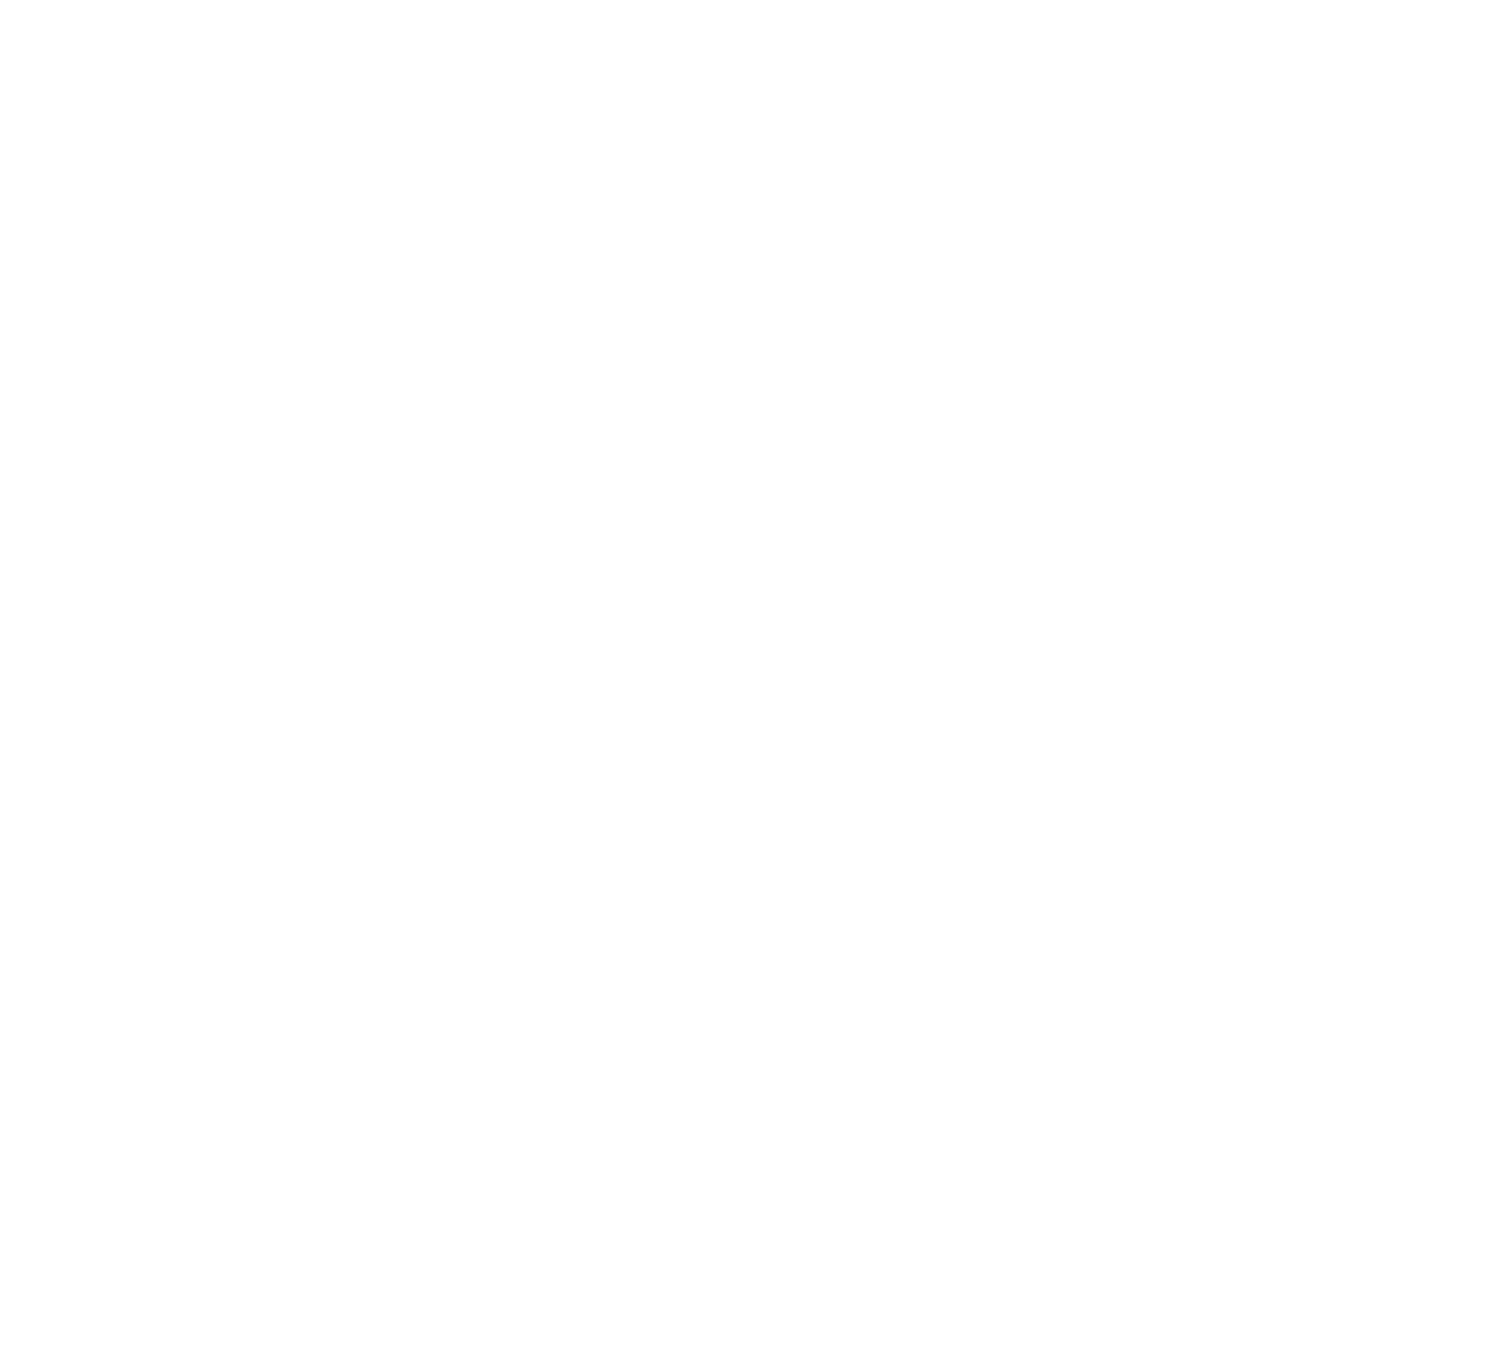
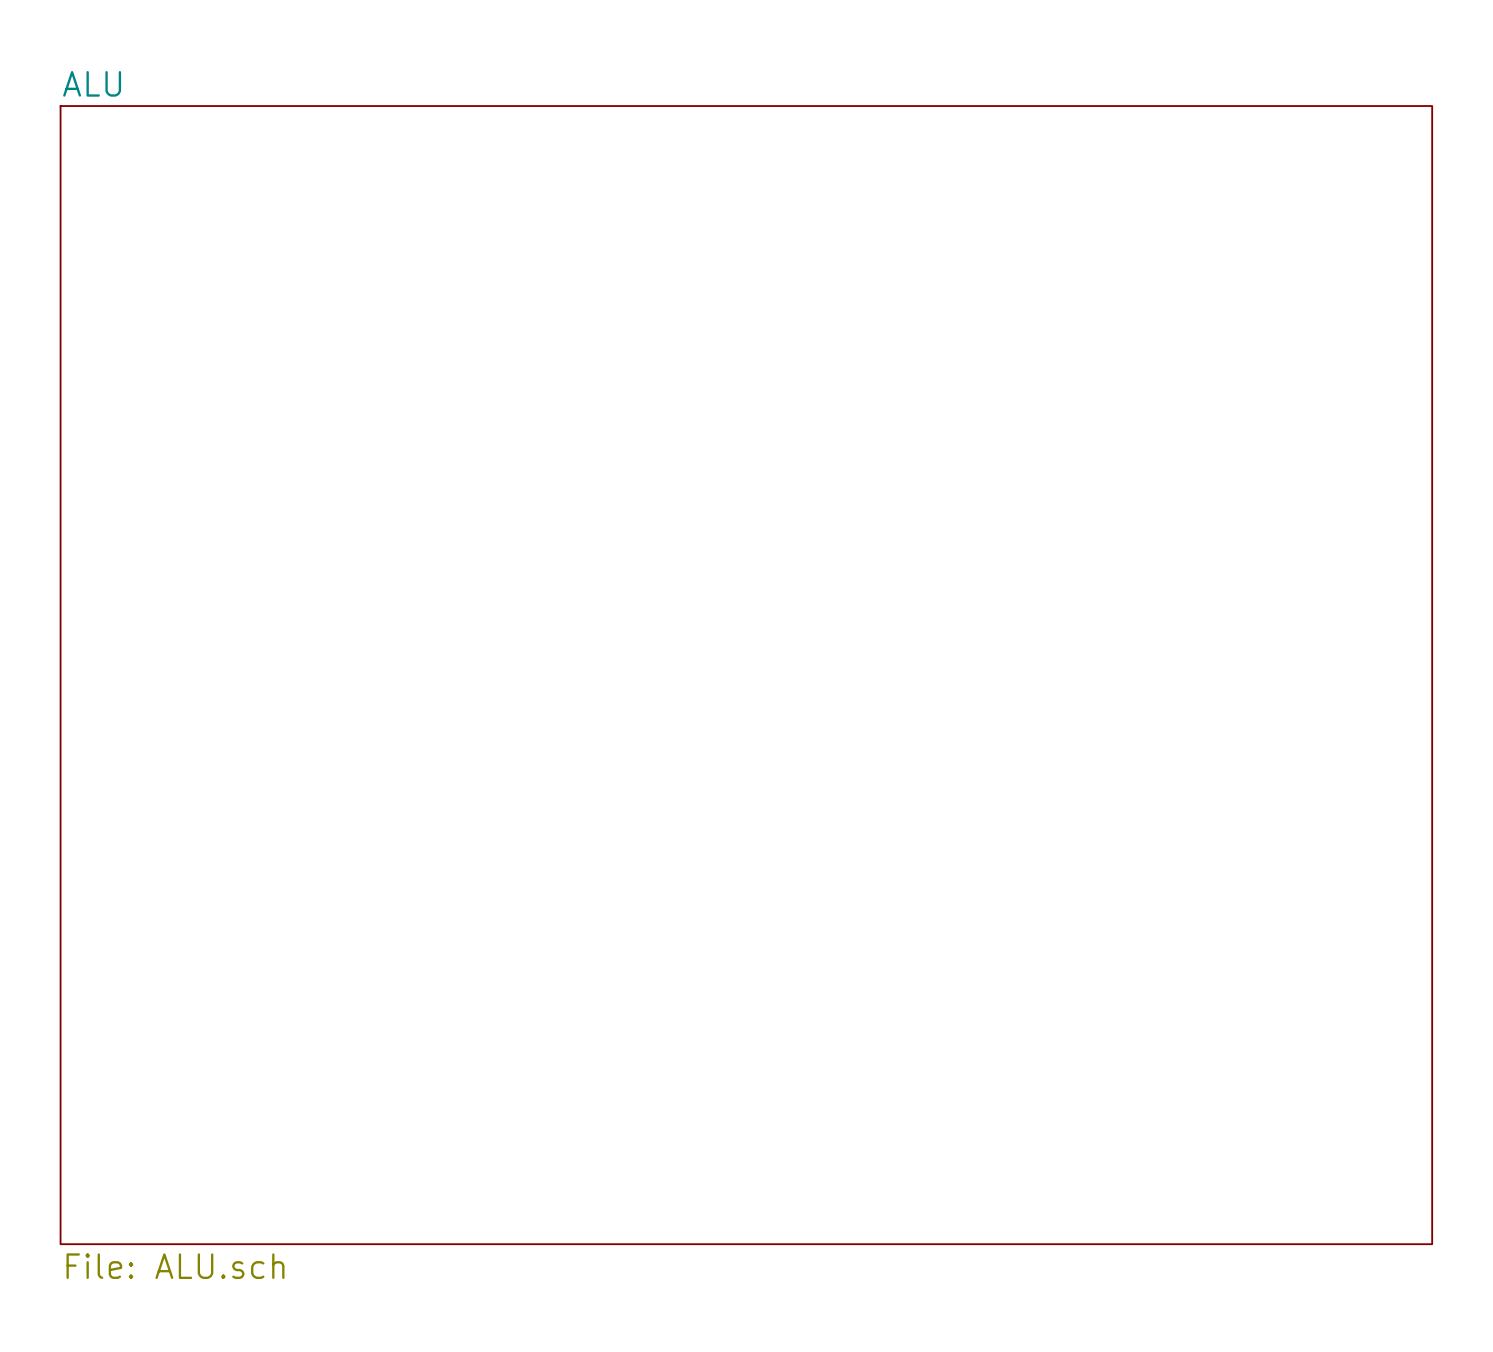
sheet ALU: none -> File: ALU.sch (746, 675)

